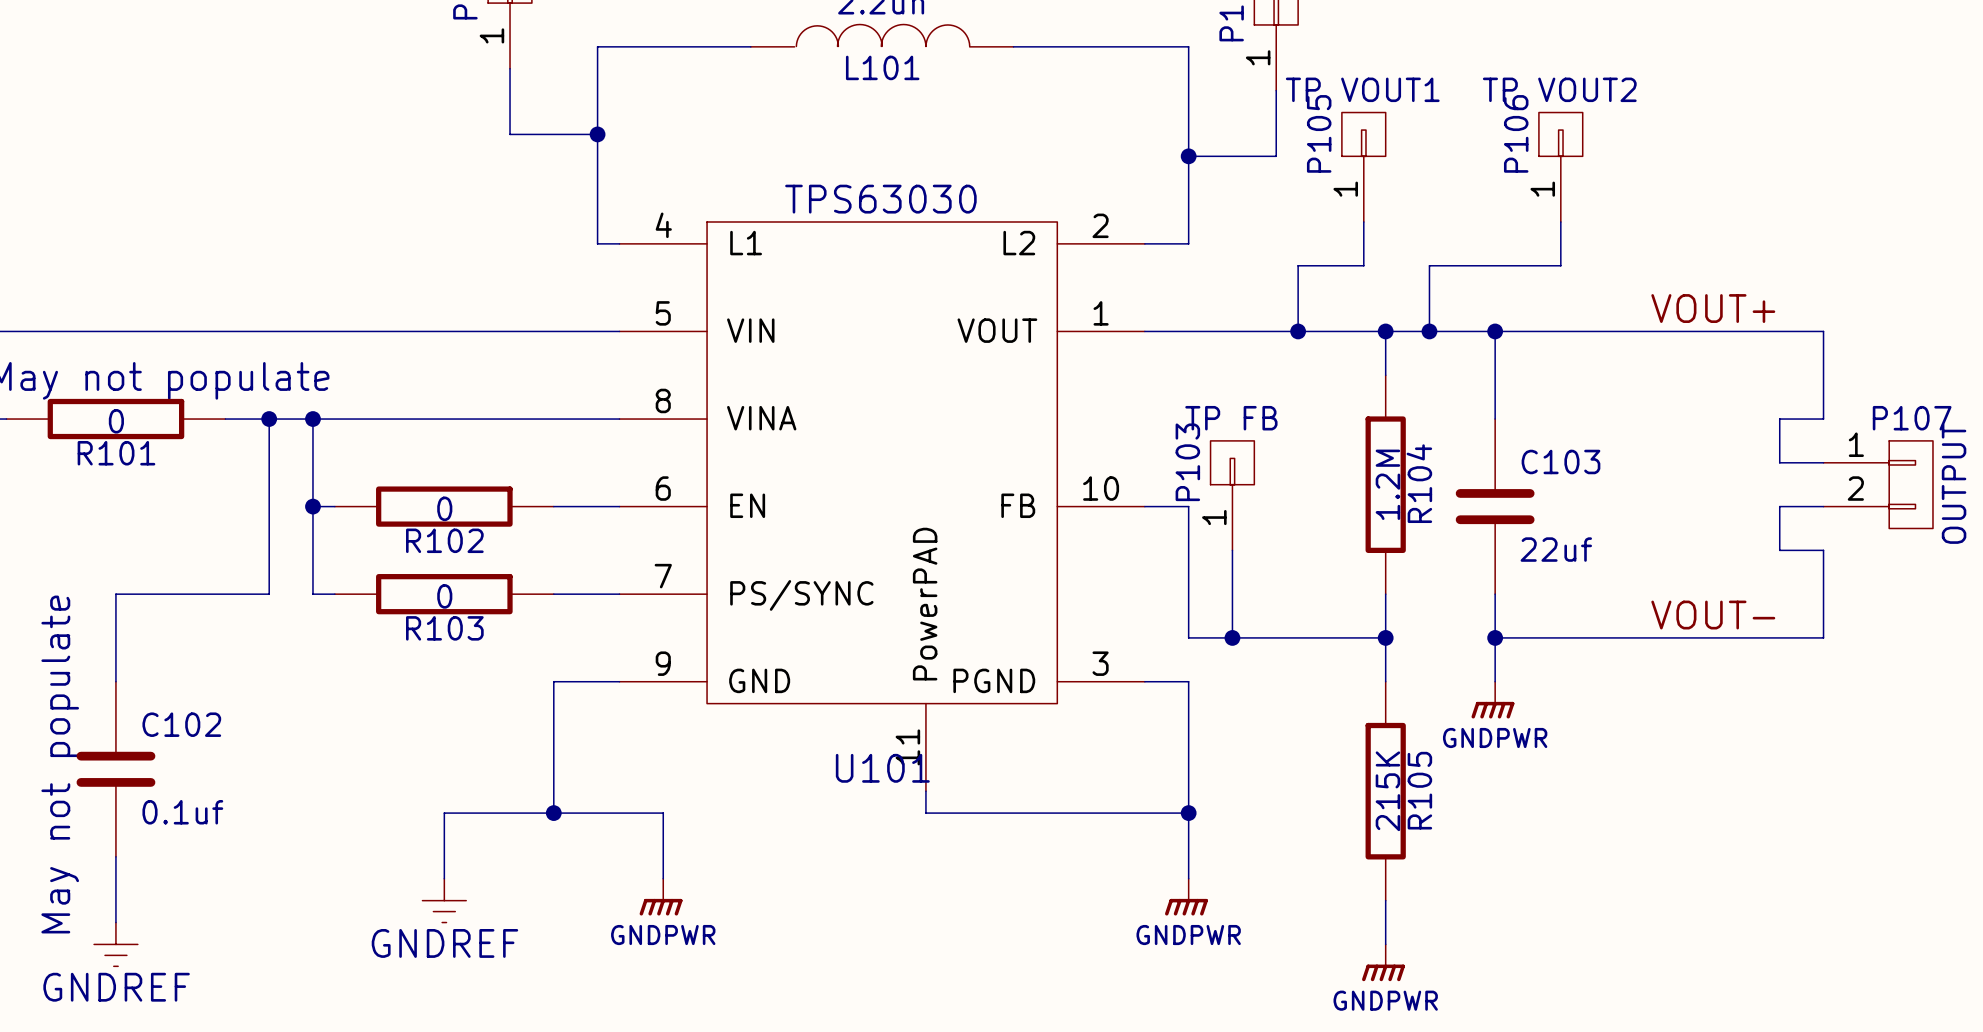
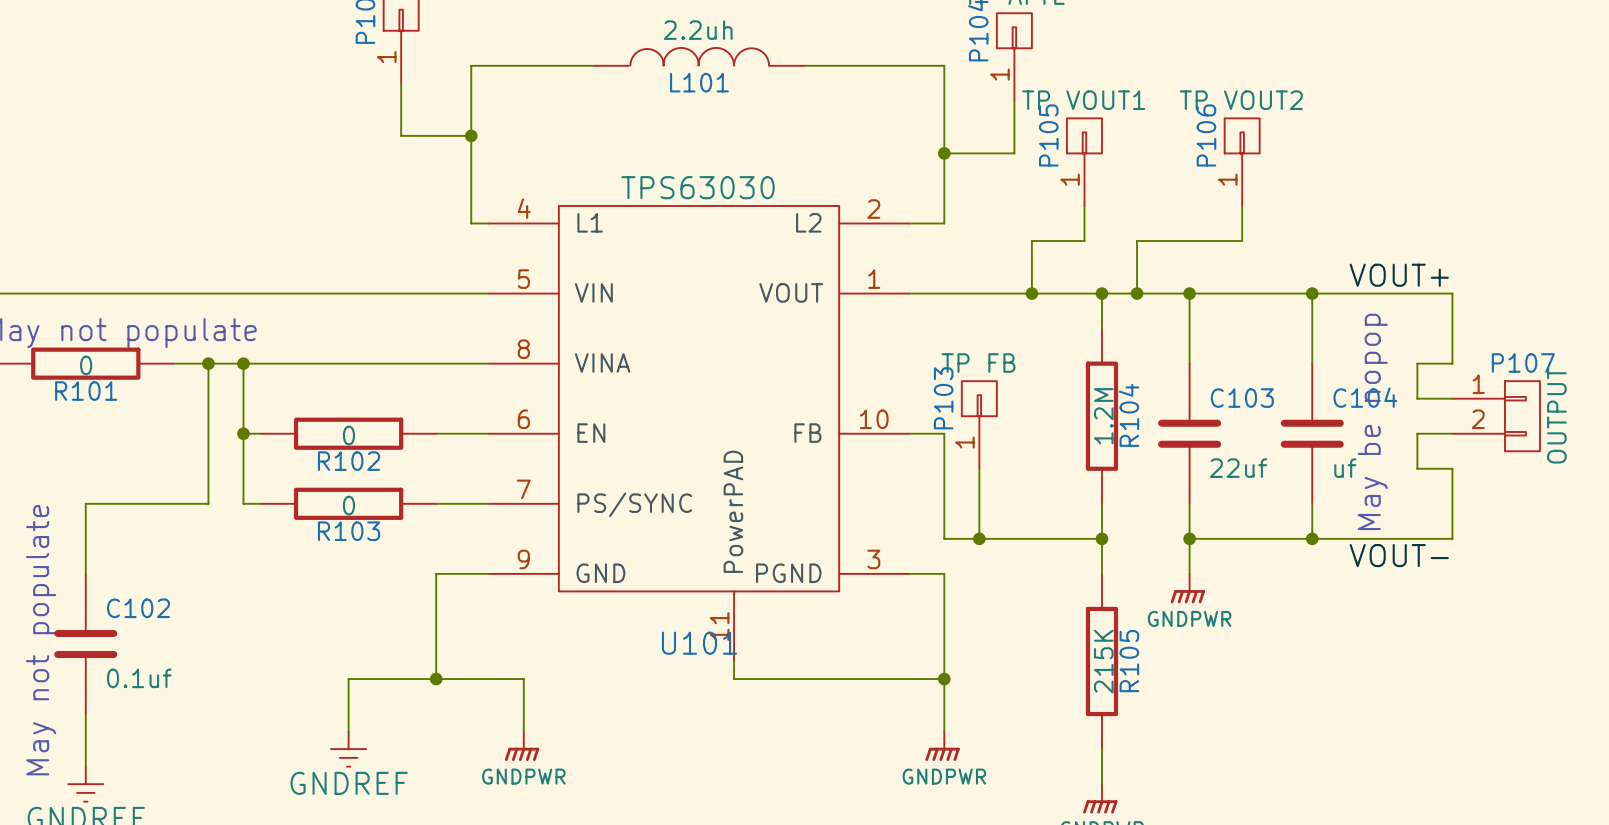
label position: VOUT+ (1713, 308) -> VOUT+ (1399, 275)
wire: none -> (1312, 293) (1312, 363)
junction: none -> (1312, 293)
text: none -> May be nopop (1372, 421)
C104: none -> uf (1312, 433)
wire: none -> (1312, 503) (1312, 538)
label position: VOUT- (1713, 615) -> VOUT- (1399, 555)
junction: none -> (1312, 538)

